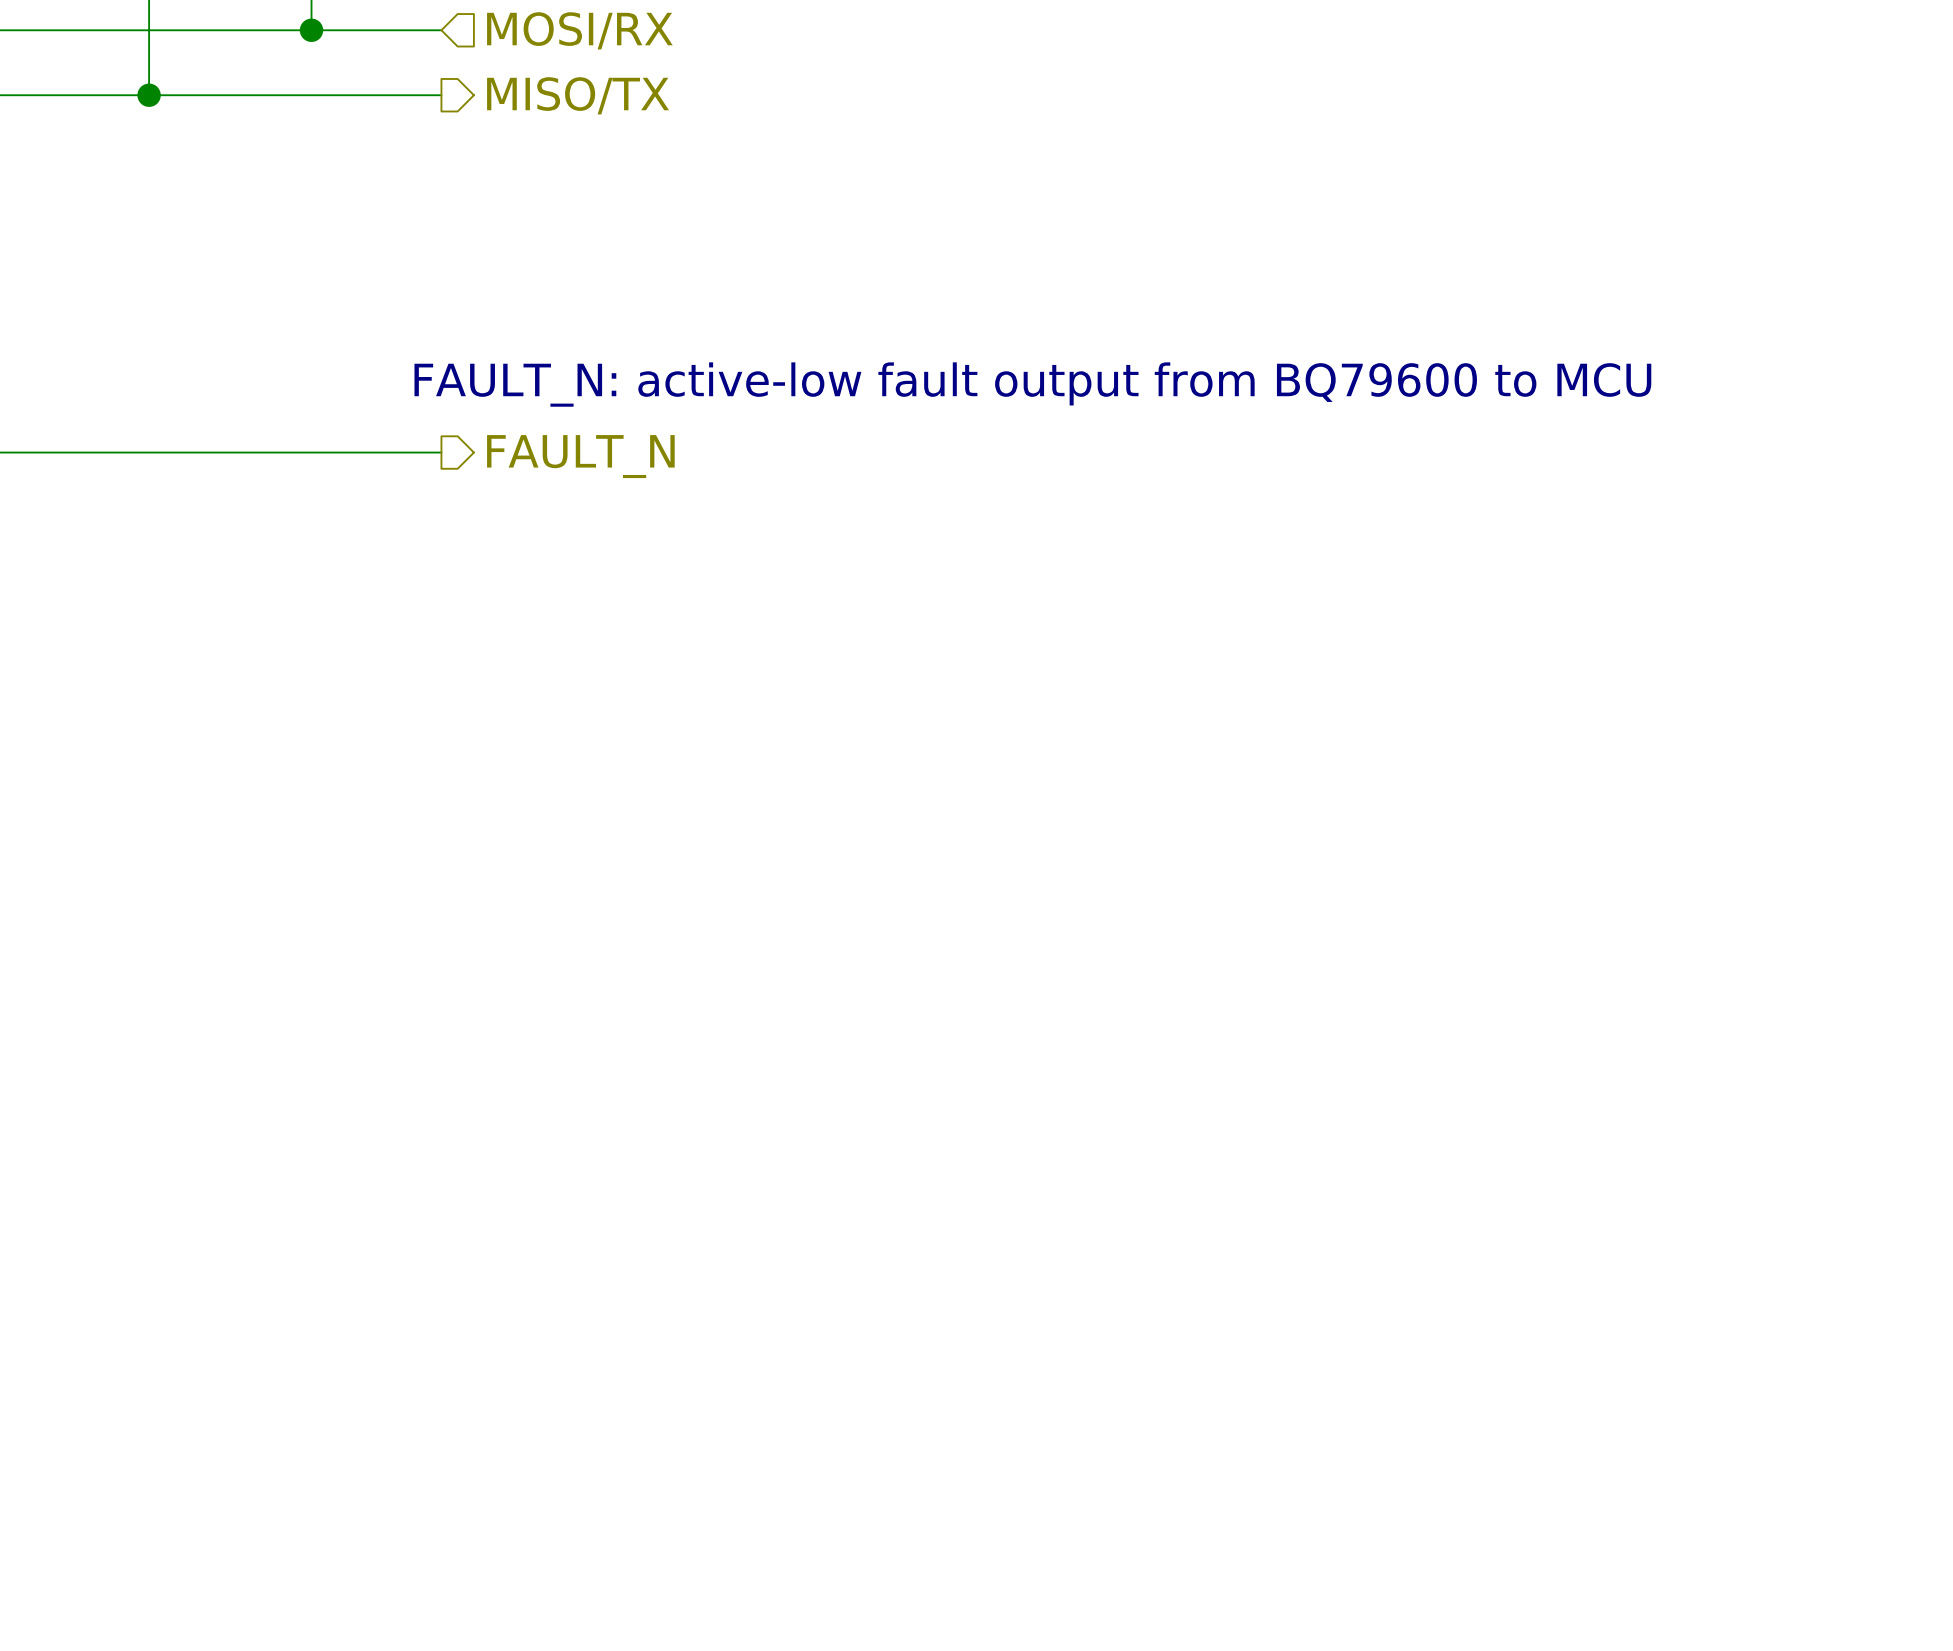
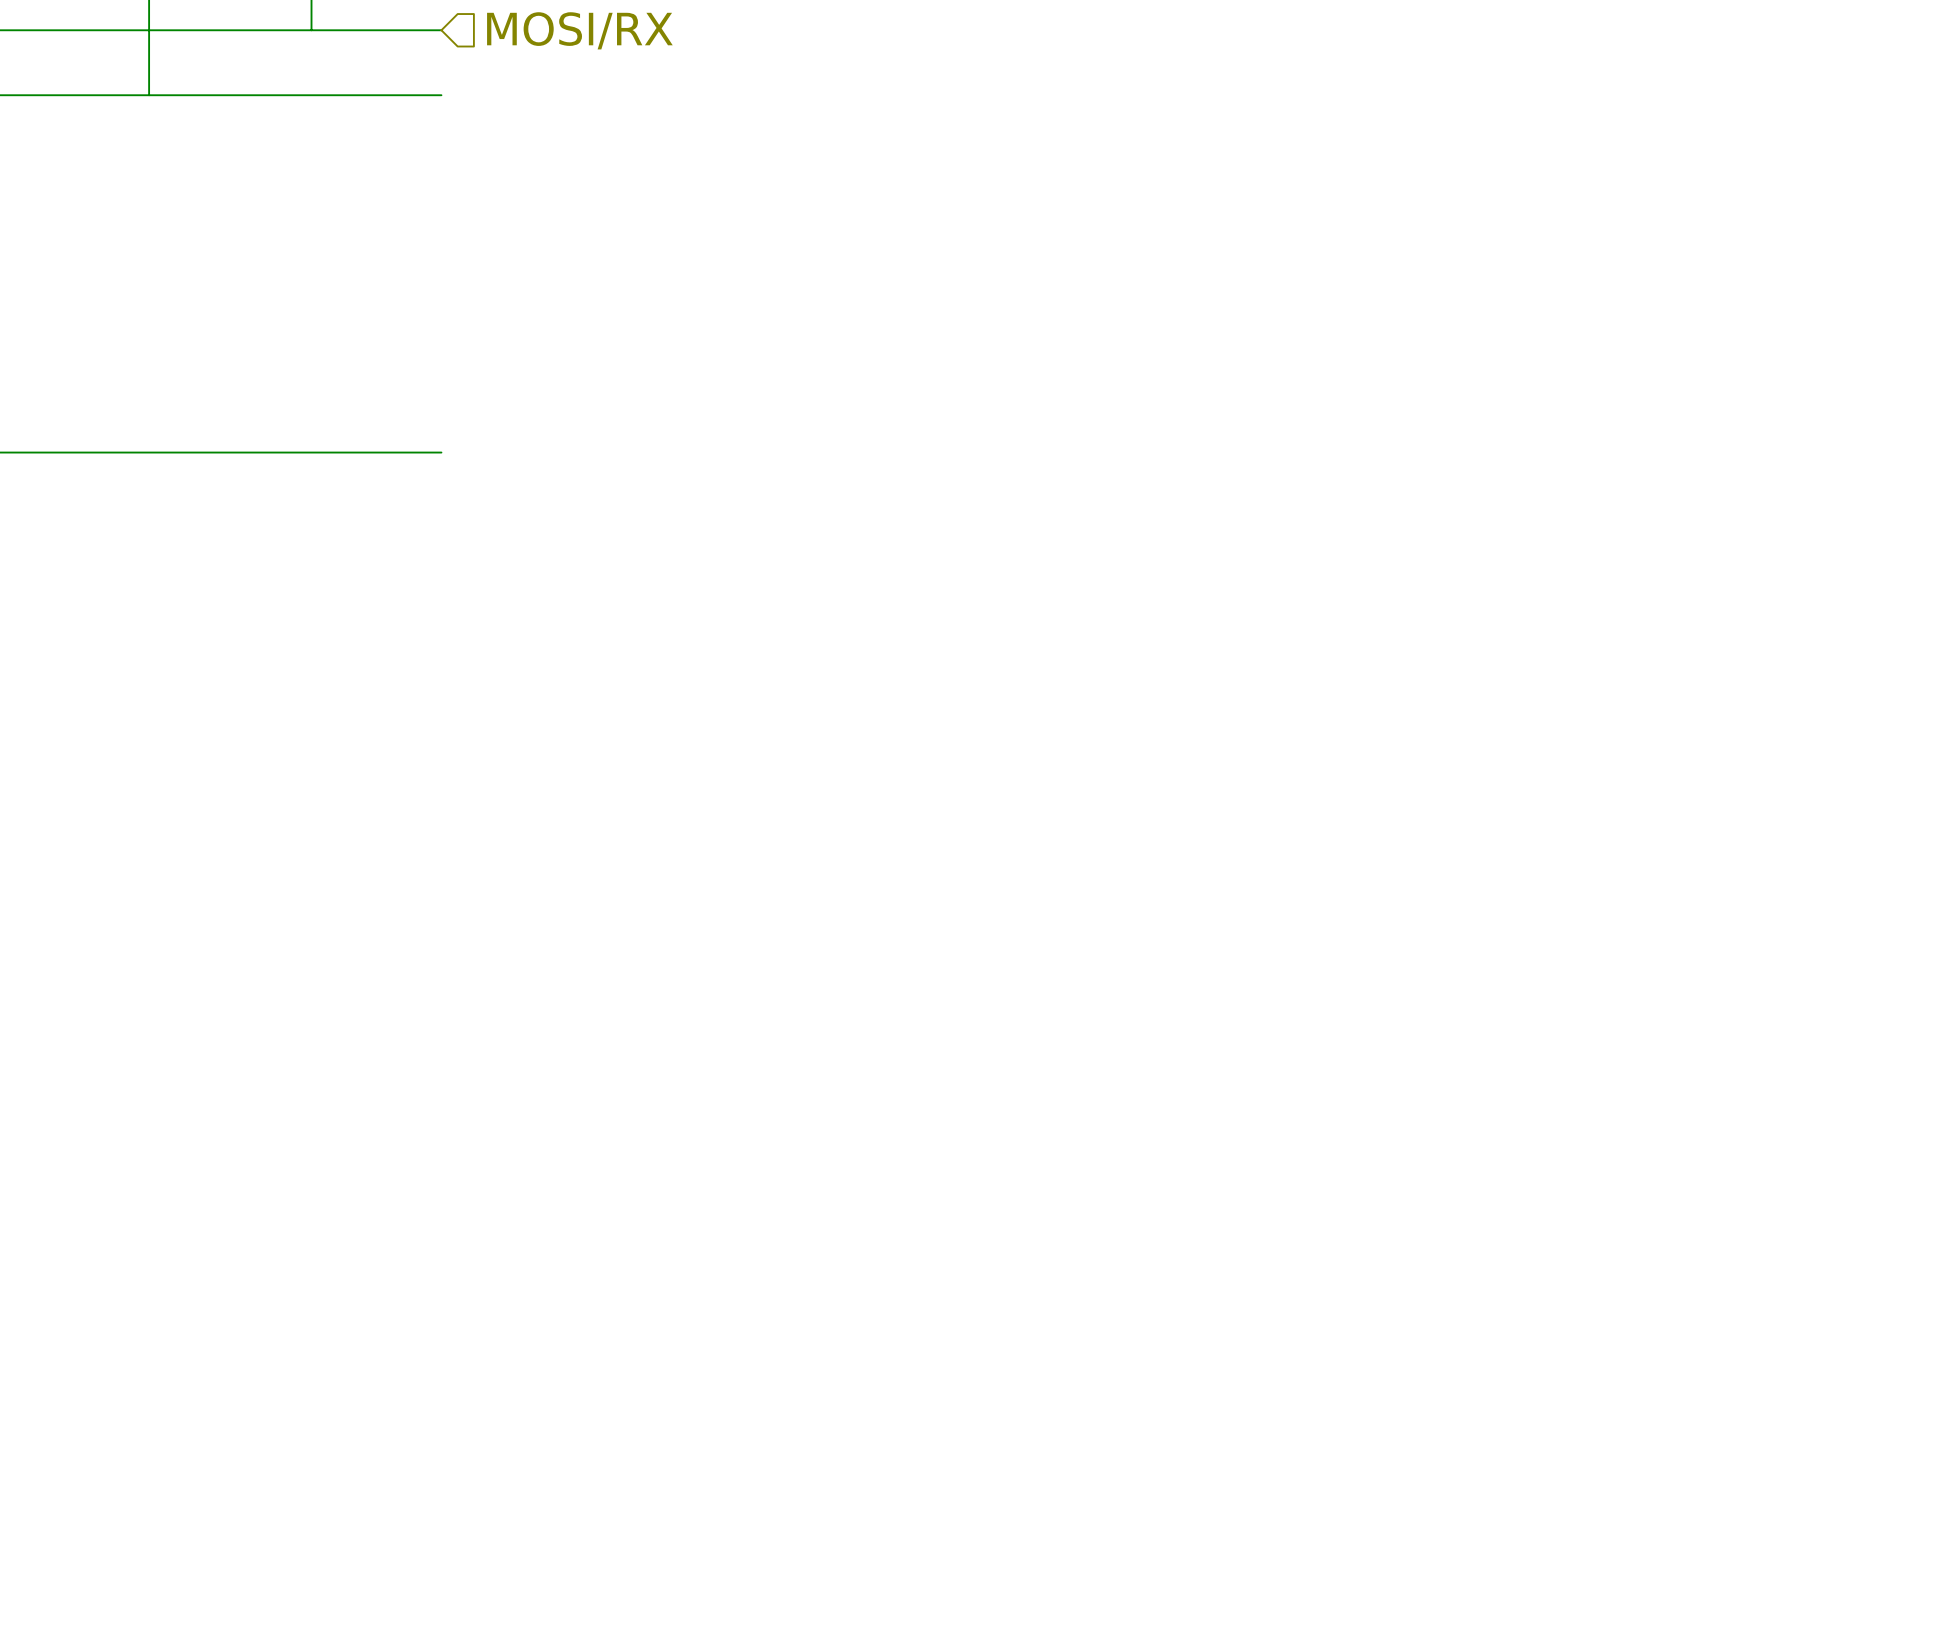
junction: (311, 30) -> none
junction: (149, 95) -> none
hierarchical label: MISO/TX (578, 95) -> none
text: FAULT_N: active-low fault output from BQ79600 to MCU (1032, 384) -> none
hierarchical label: FAULT_N (580, 456) -> none

